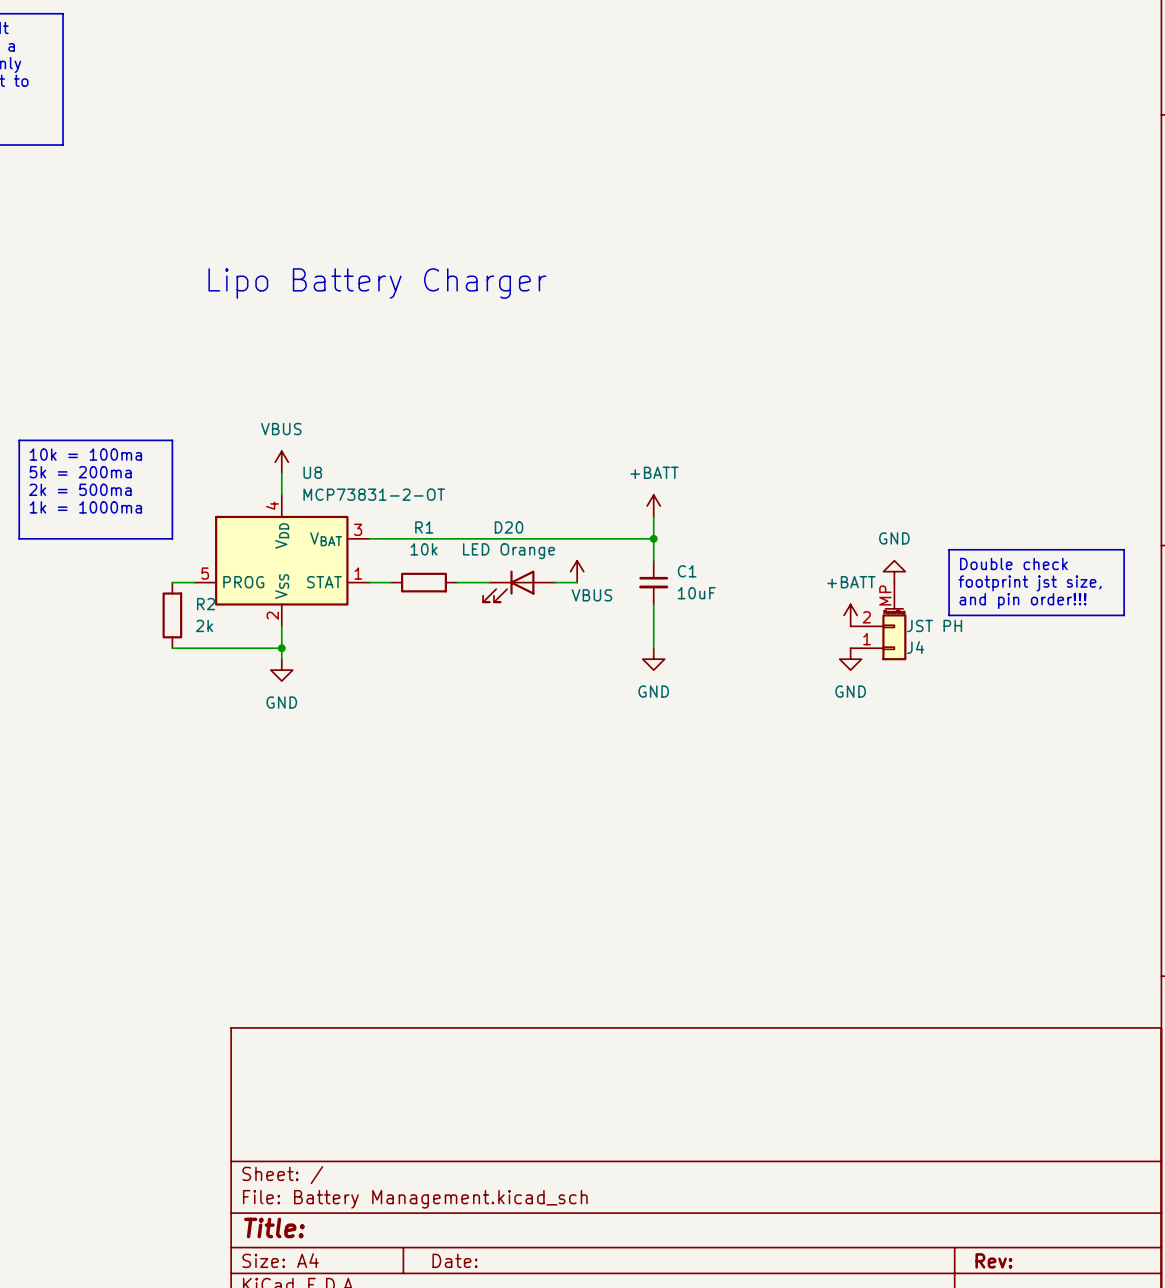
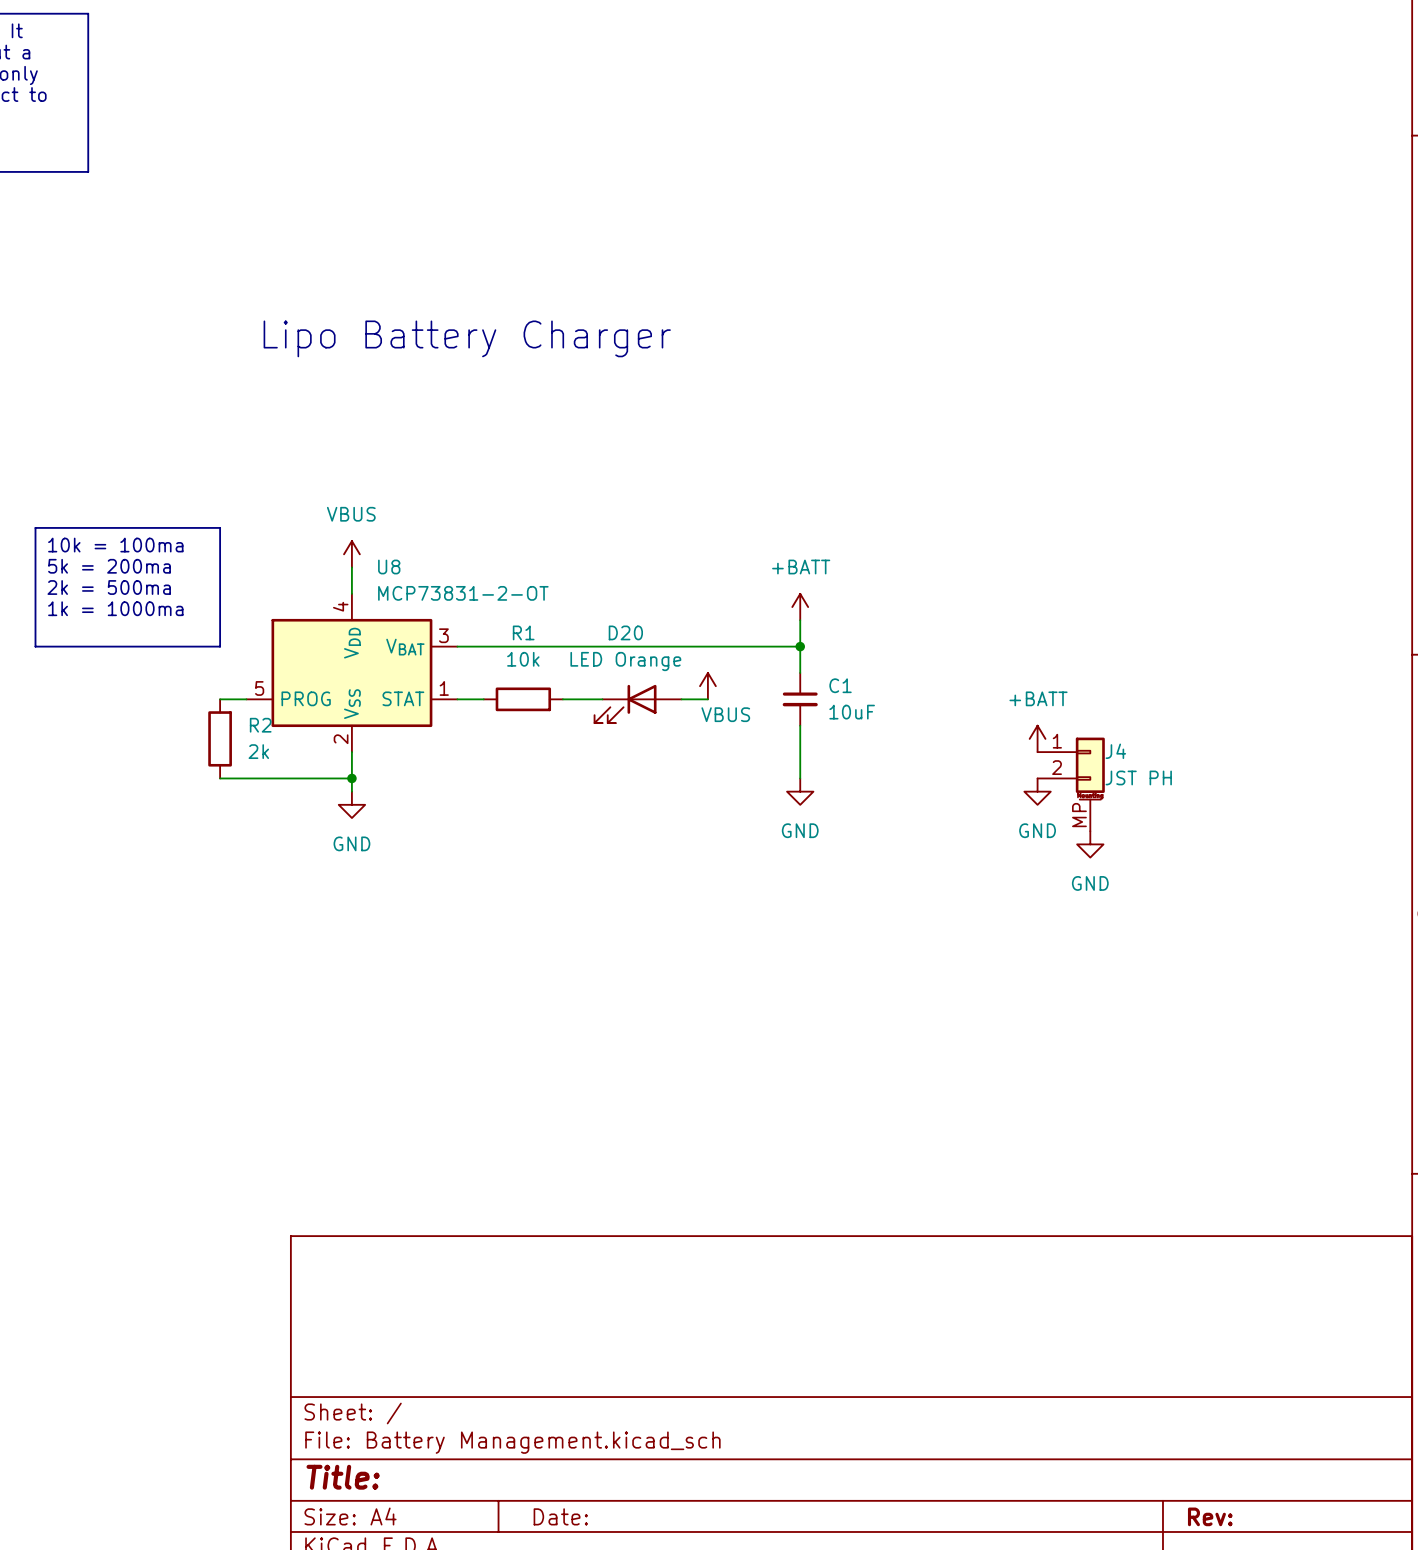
line: (949, 549) (1124, 549) (1124, 615) (949, 615) (949, 549) -> none
text: Double check (1013, 563) -> none
power symbol rotation: 0° (894, 571) -> 180° (1090, 844)
power symbol position: GND (894, 571) -> GND (1090, 844)
text: footprint jst size, (1030, 583) -> none
text: and pin order!!! (1023, 601) -> none
J4 flip: as is (894, 634) -> up-down (1090, 768)

